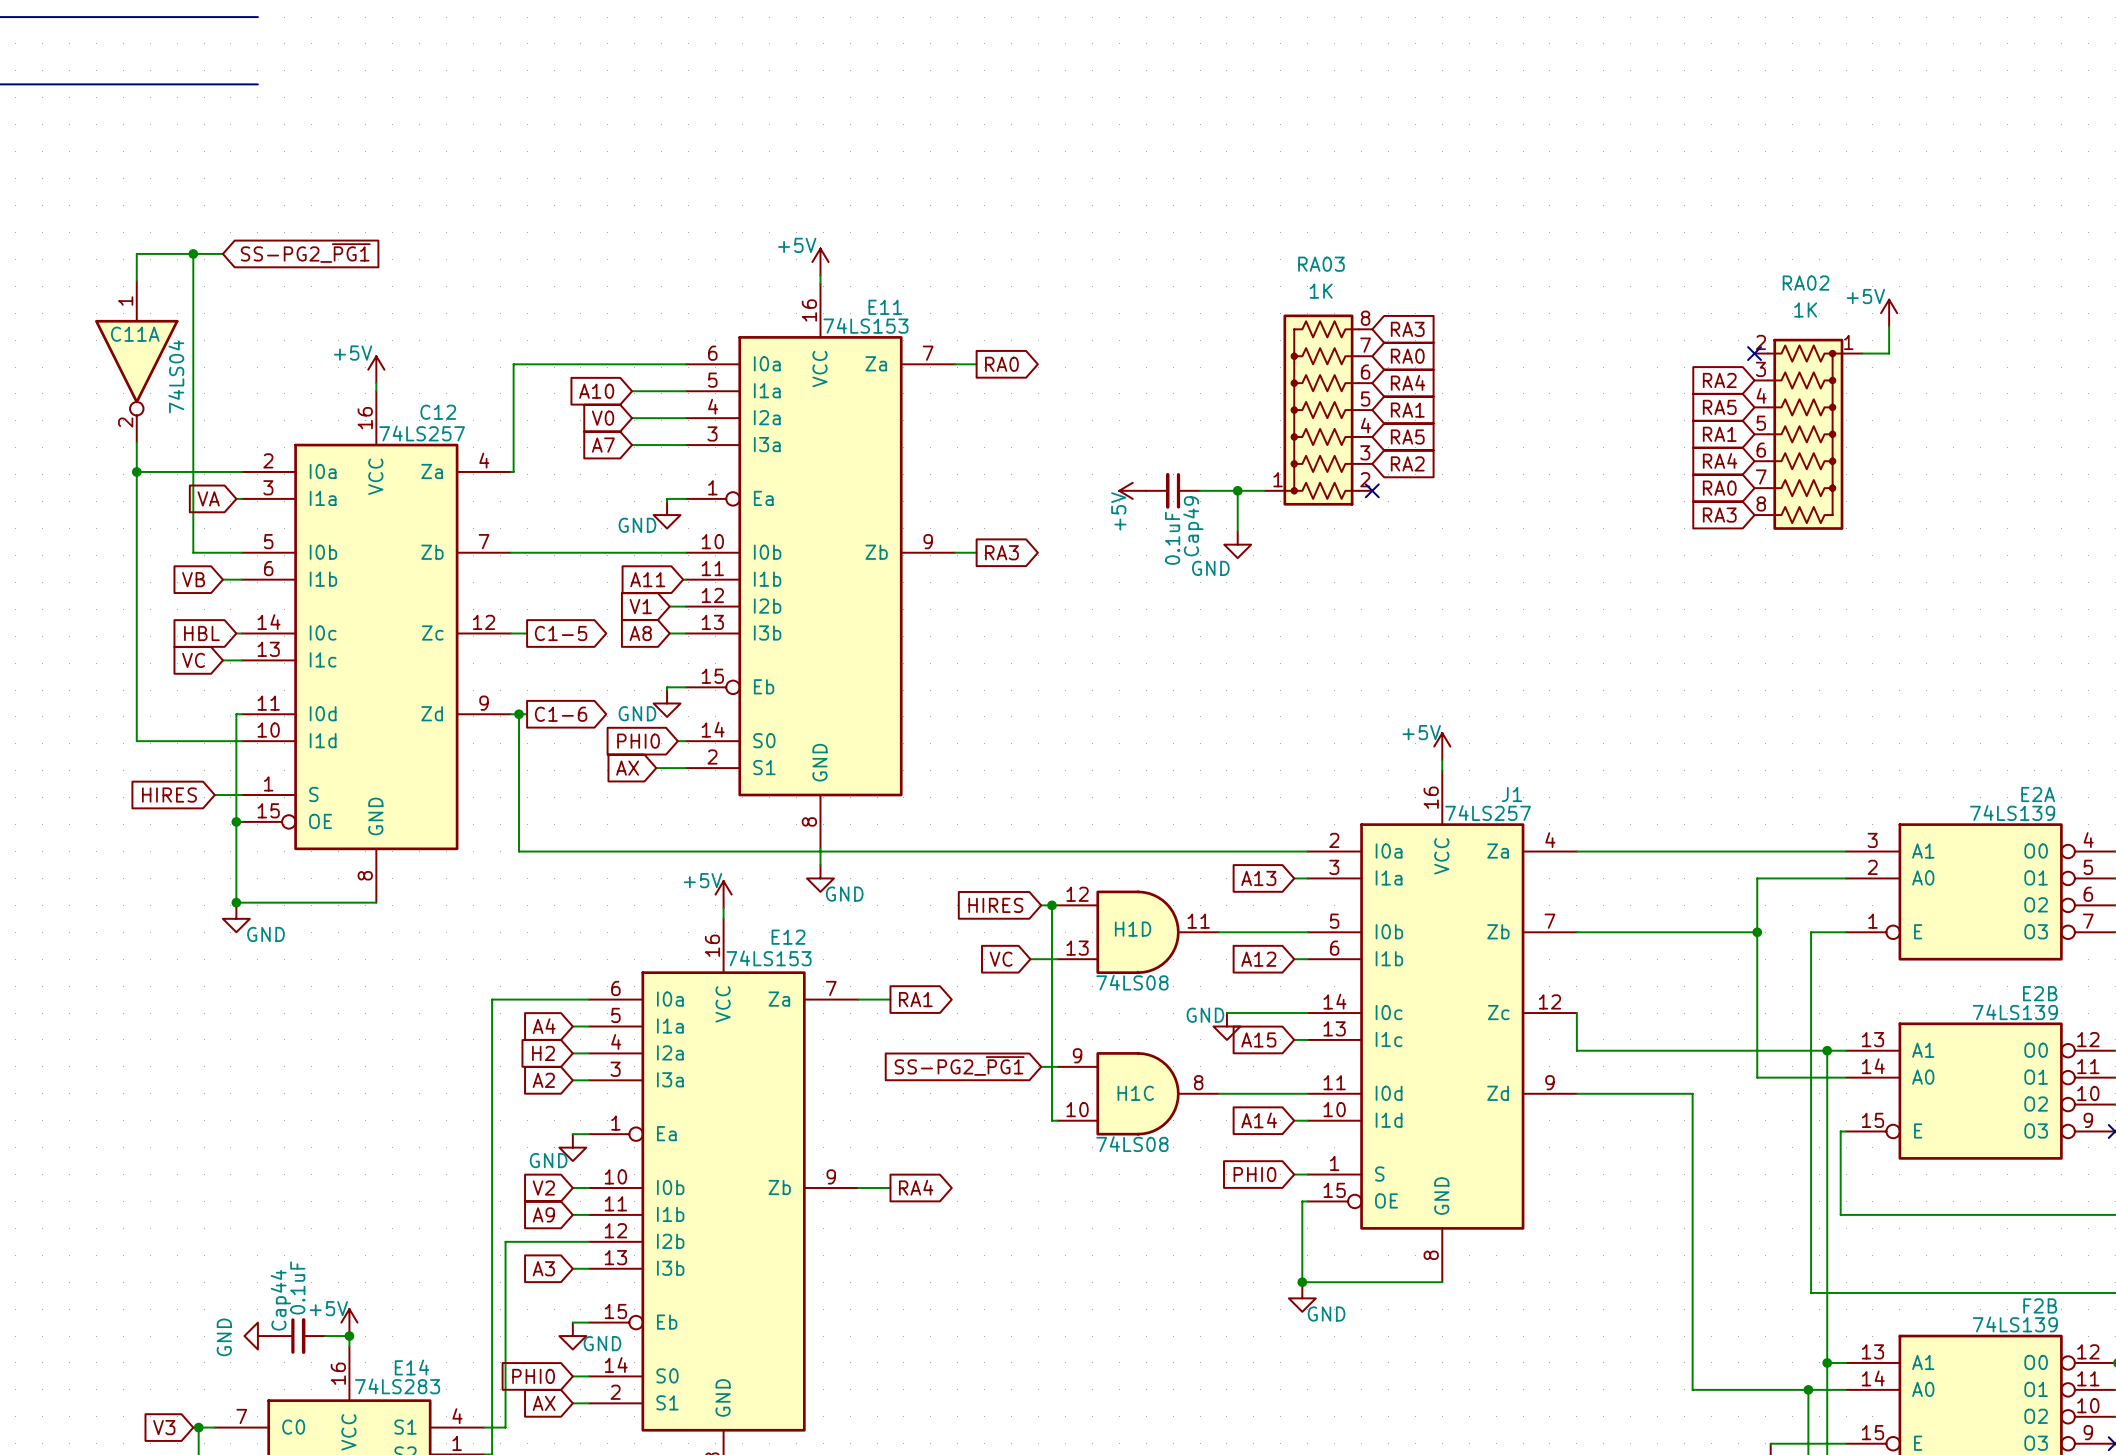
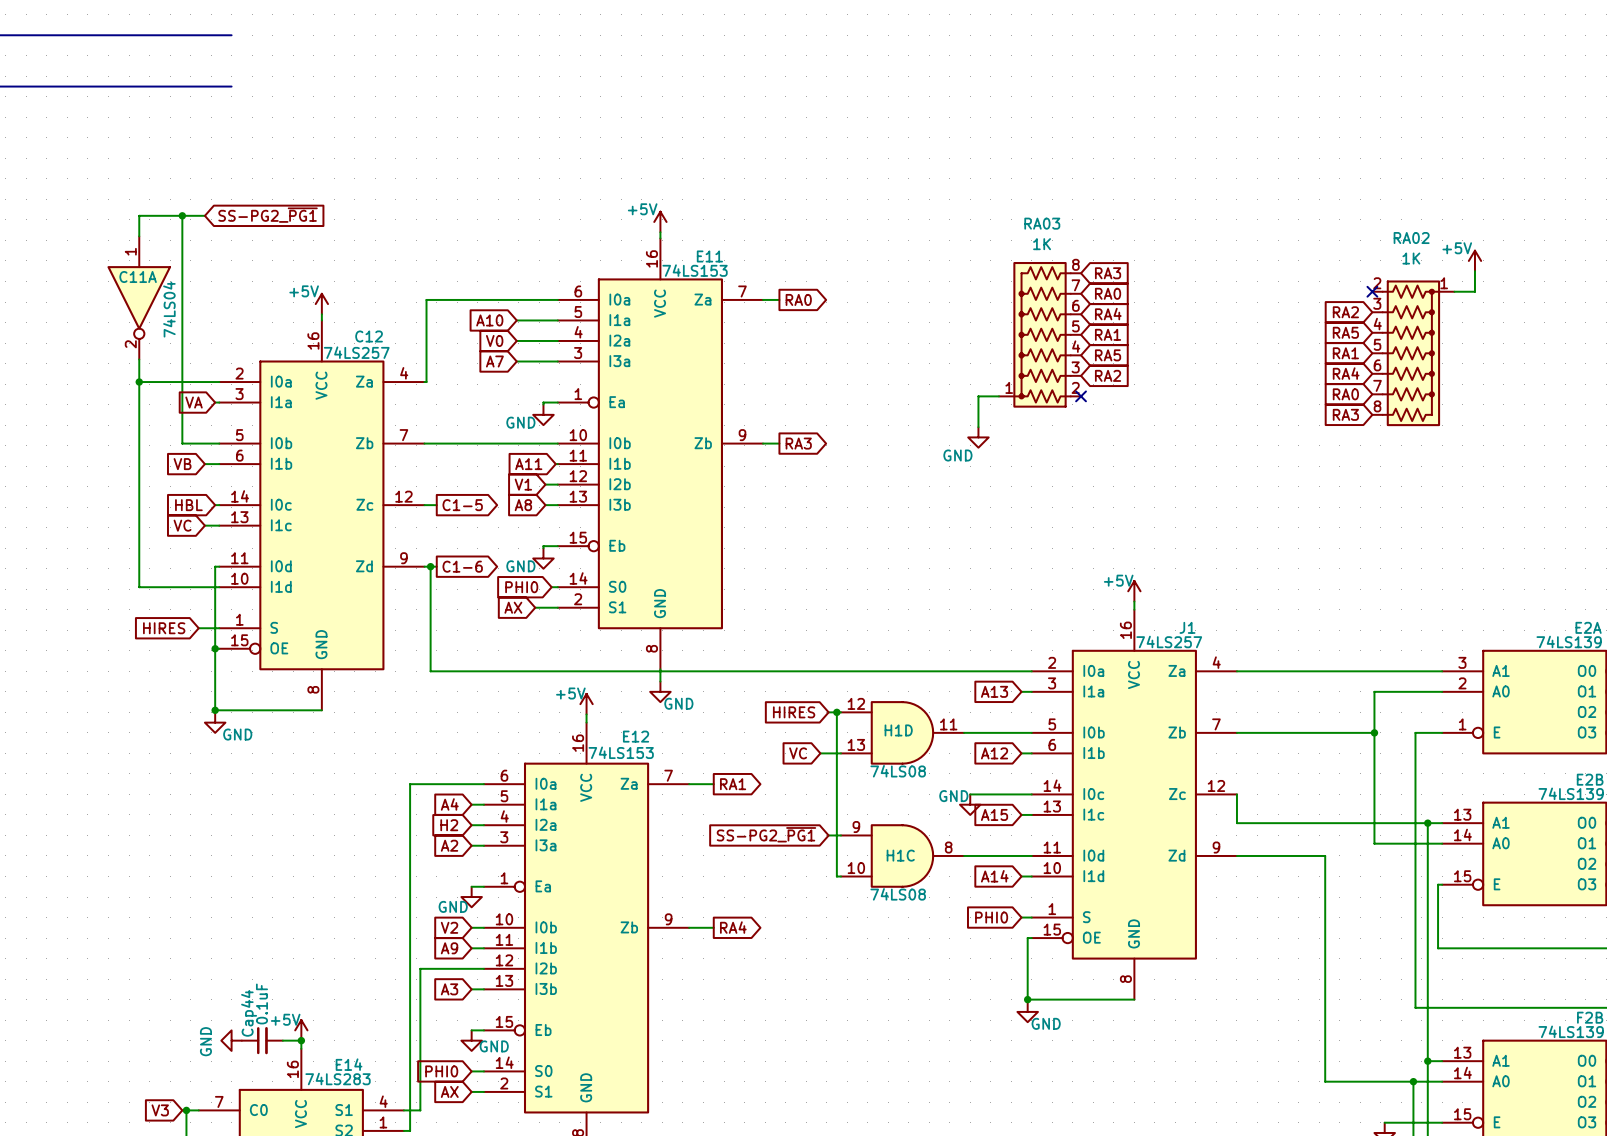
power symbol: +5V (1132, 490) -> none
Cap49: 0.1uF (1173, 490) -> none
wire: (1200, 490) (1237, 490) -> none
junction: (1237, 490) -> none

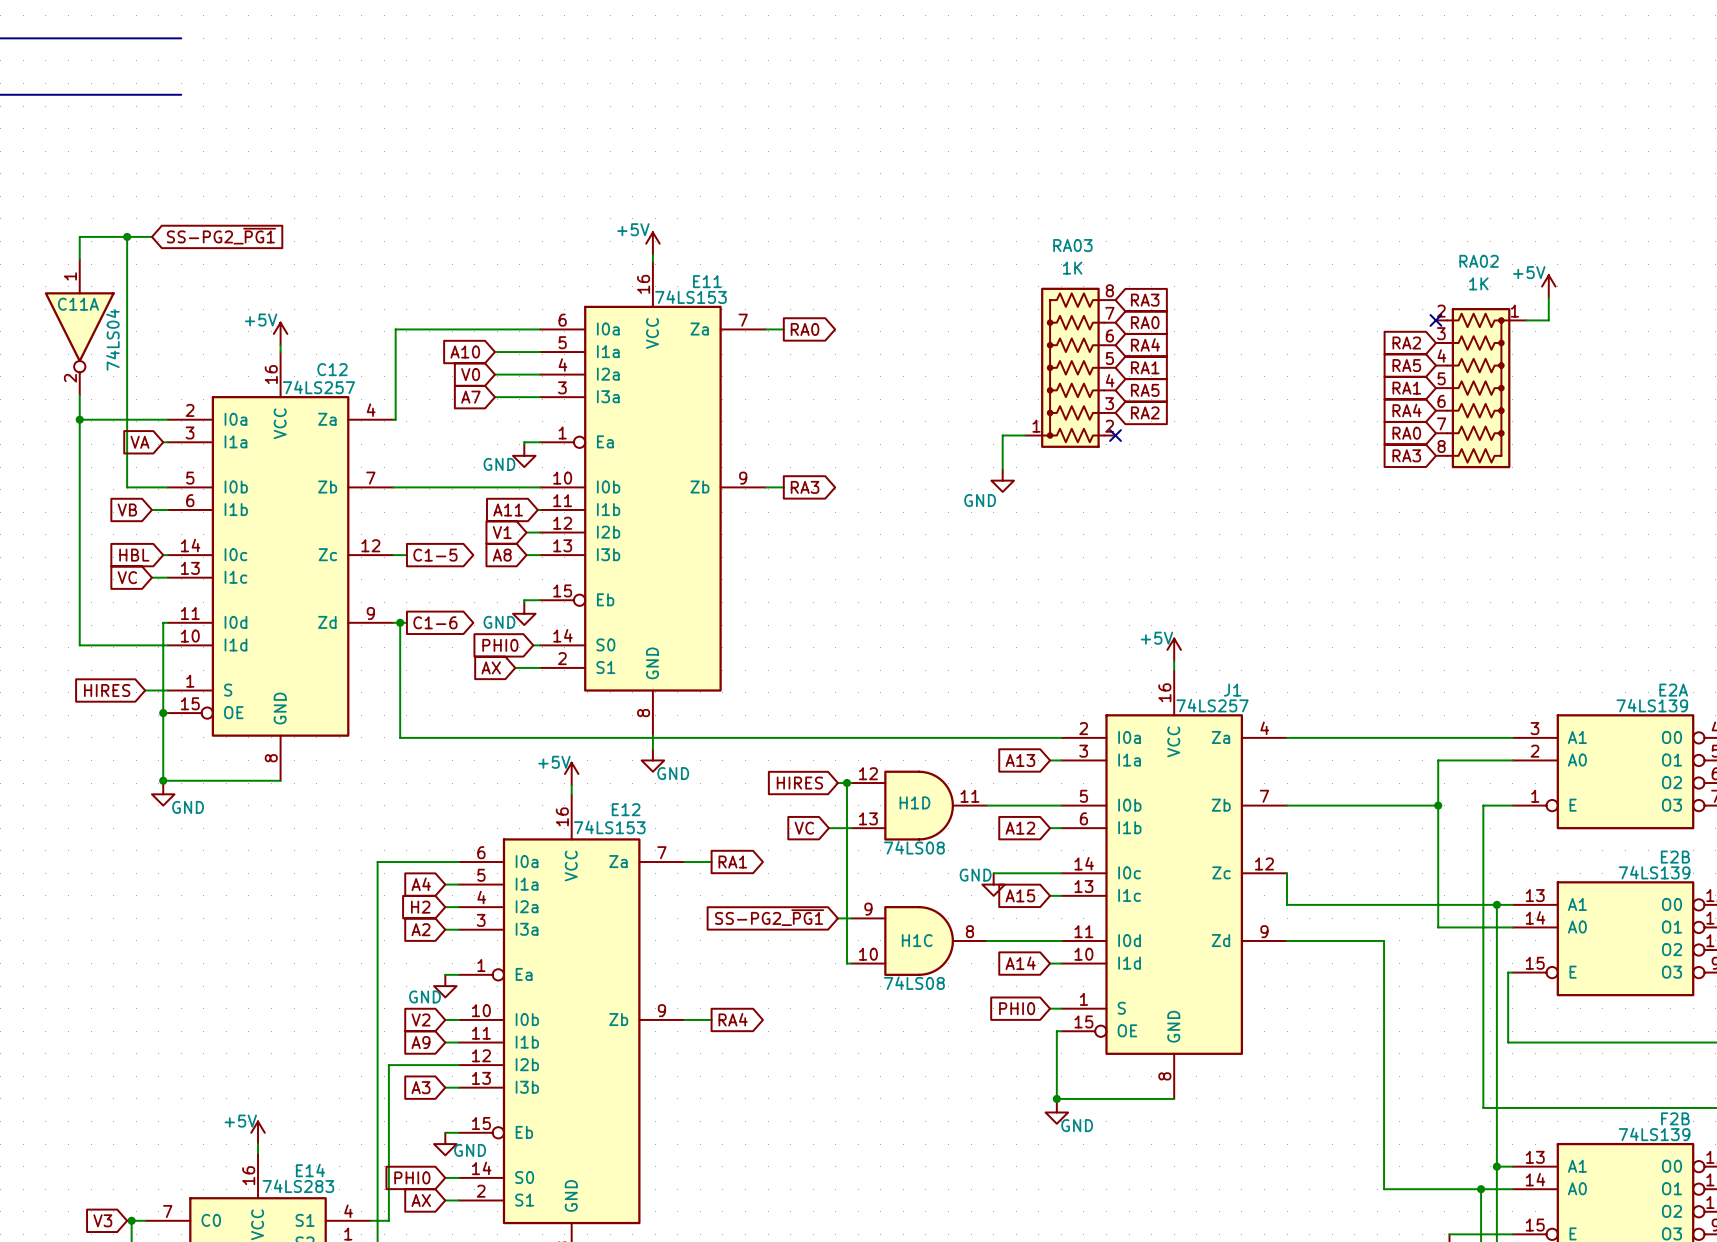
power symbol: GND (231, 1040) -> none
Cap44: 0.1uF (262, 1040) -> none
wire: (282, 1040) (301, 1040) -> none
junction: (301, 1040) -> none

